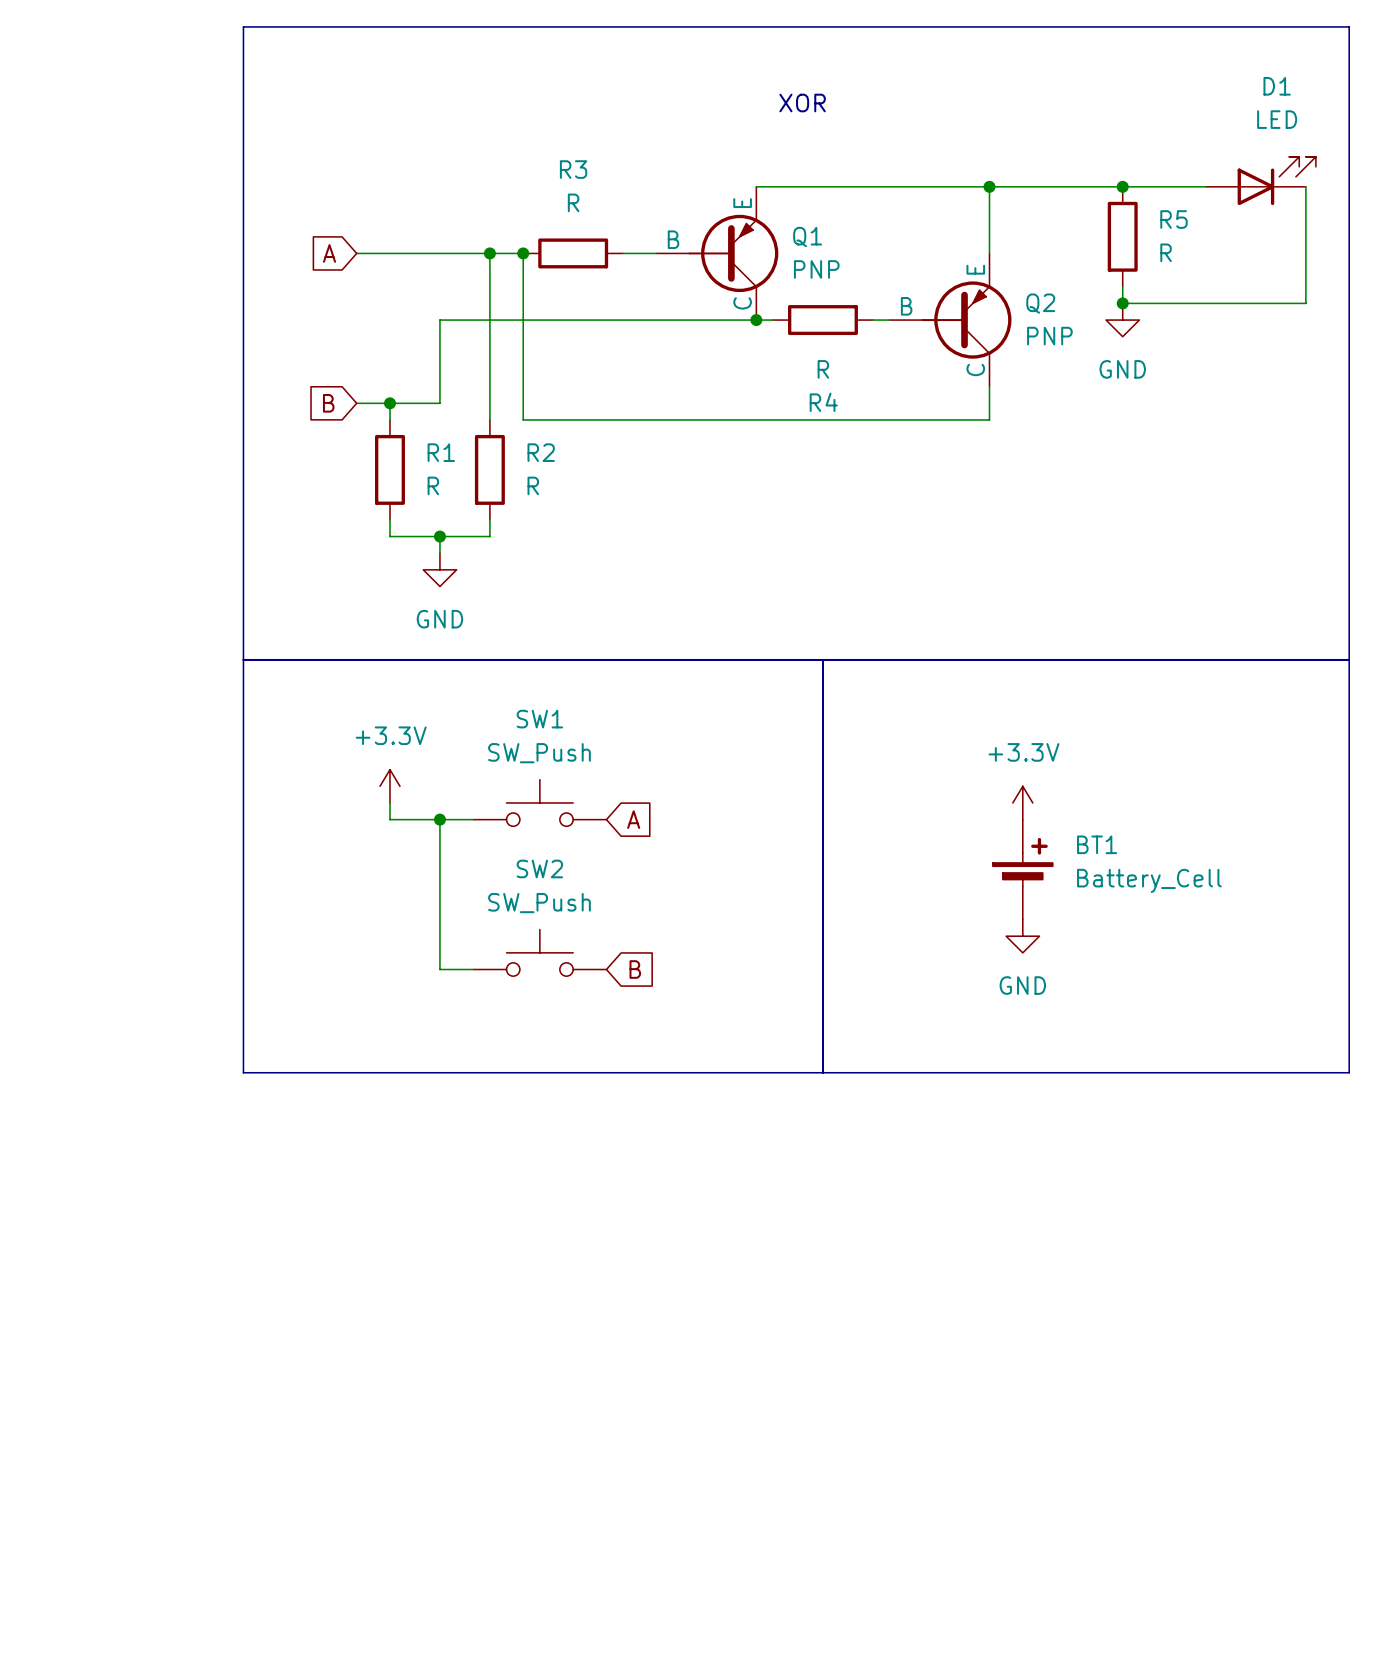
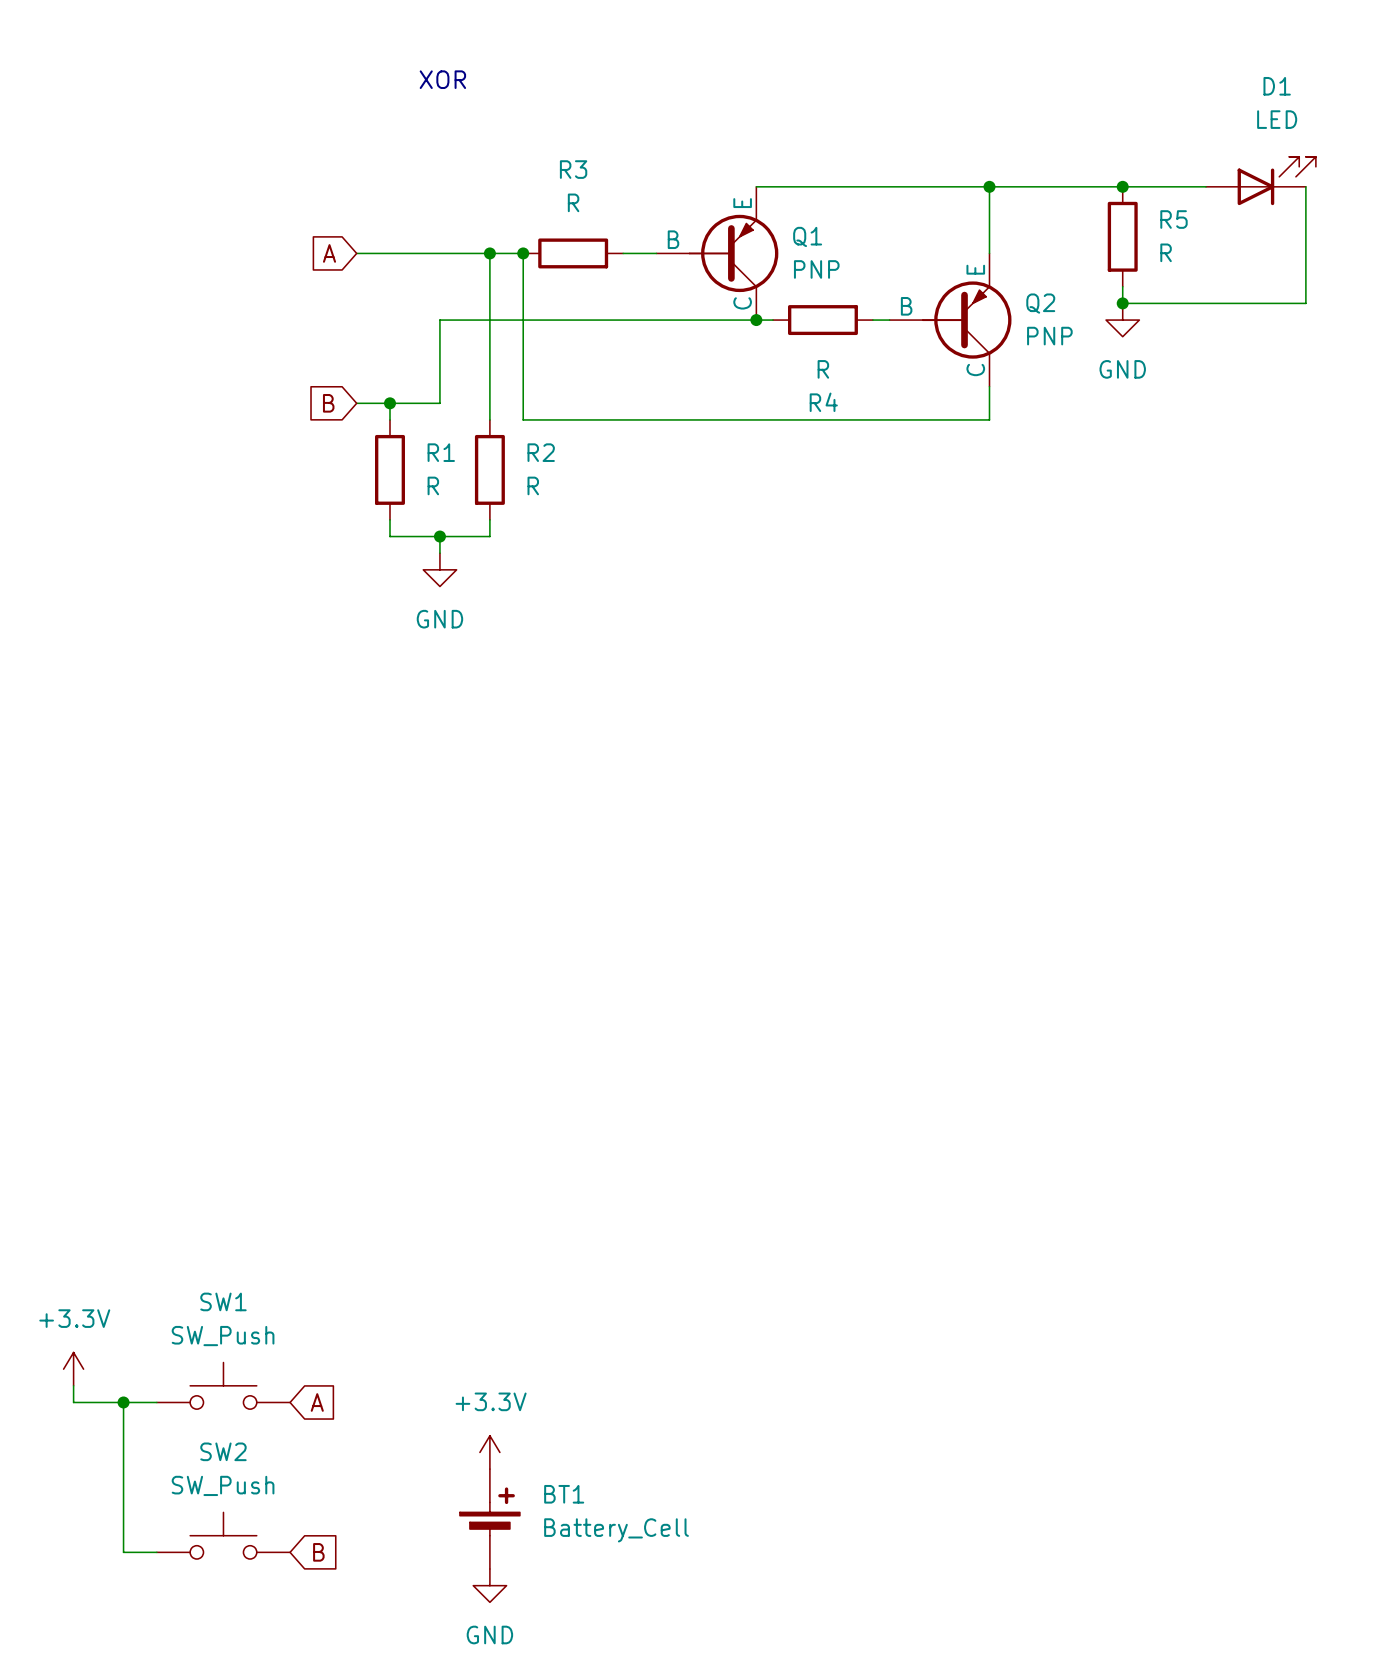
line: (243, 26) (1349, 26) (1349, 1072) (243, 1072) (243, 26) -> none
text: none -> XOR (442, 79)
text: XOR (802, 103) -> none
line: (243, 659) (1349, 659) -> none
line: (822, 659) (822, 1072) -> none
power symbol: +3.3V (389, 786) -> none
wire: (389, 802) (389, 819) (473, 819) -> none
SW1 position: (539, 802) -> (223, 1385)
power symbol: +3.3V (1022, 802) -> none
wire: (439, 819) (439, 969) (473, 969) -> none
junction: (439, 819) -> none
global label: A (633, 819) -> none
BT1 position: (1022, 869) -> (489, 1519)
power symbol: GND (1022, 936) -> none
SW2 position: (539, 952) -> (223, 1535)
global label: B (635, 969) -> none
power symbol: none -> +3.3V (73, 1369)
wire: none -> (73, 1385) (73, 1402) (156, 1402)
wire: none -> (123, 1402) (123, 1552) (156, 1552)
junction: none -> (123, 1402)
global label: none -> A (317, 1402)
power symbol: none -> +3.3V (489, 1452)
global label: none -> B (318, 1552)
power symbol: none -> GND (489, 1585)

